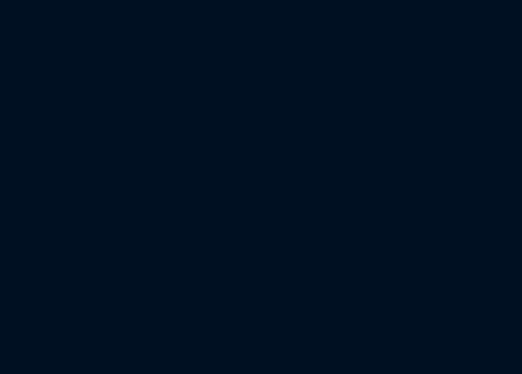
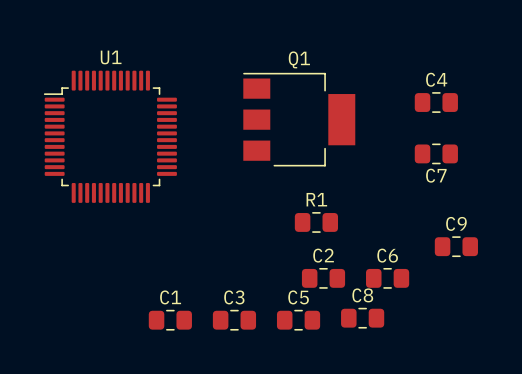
C4: none -> (436, 102)
Q1: none -> (299, 119)
U1: none -> (110, 136)
C7: none -> (436, 153)
R1: none -> (316, 222)
C9: none -> (456, 246)
C2: none -> (323, 278)
C6: none -> (387, 278)
C8: none -> (362, 318)
C1: none -> (170, 320)
C3: none -> (234, 320)
C5: none -> (298, 320)

